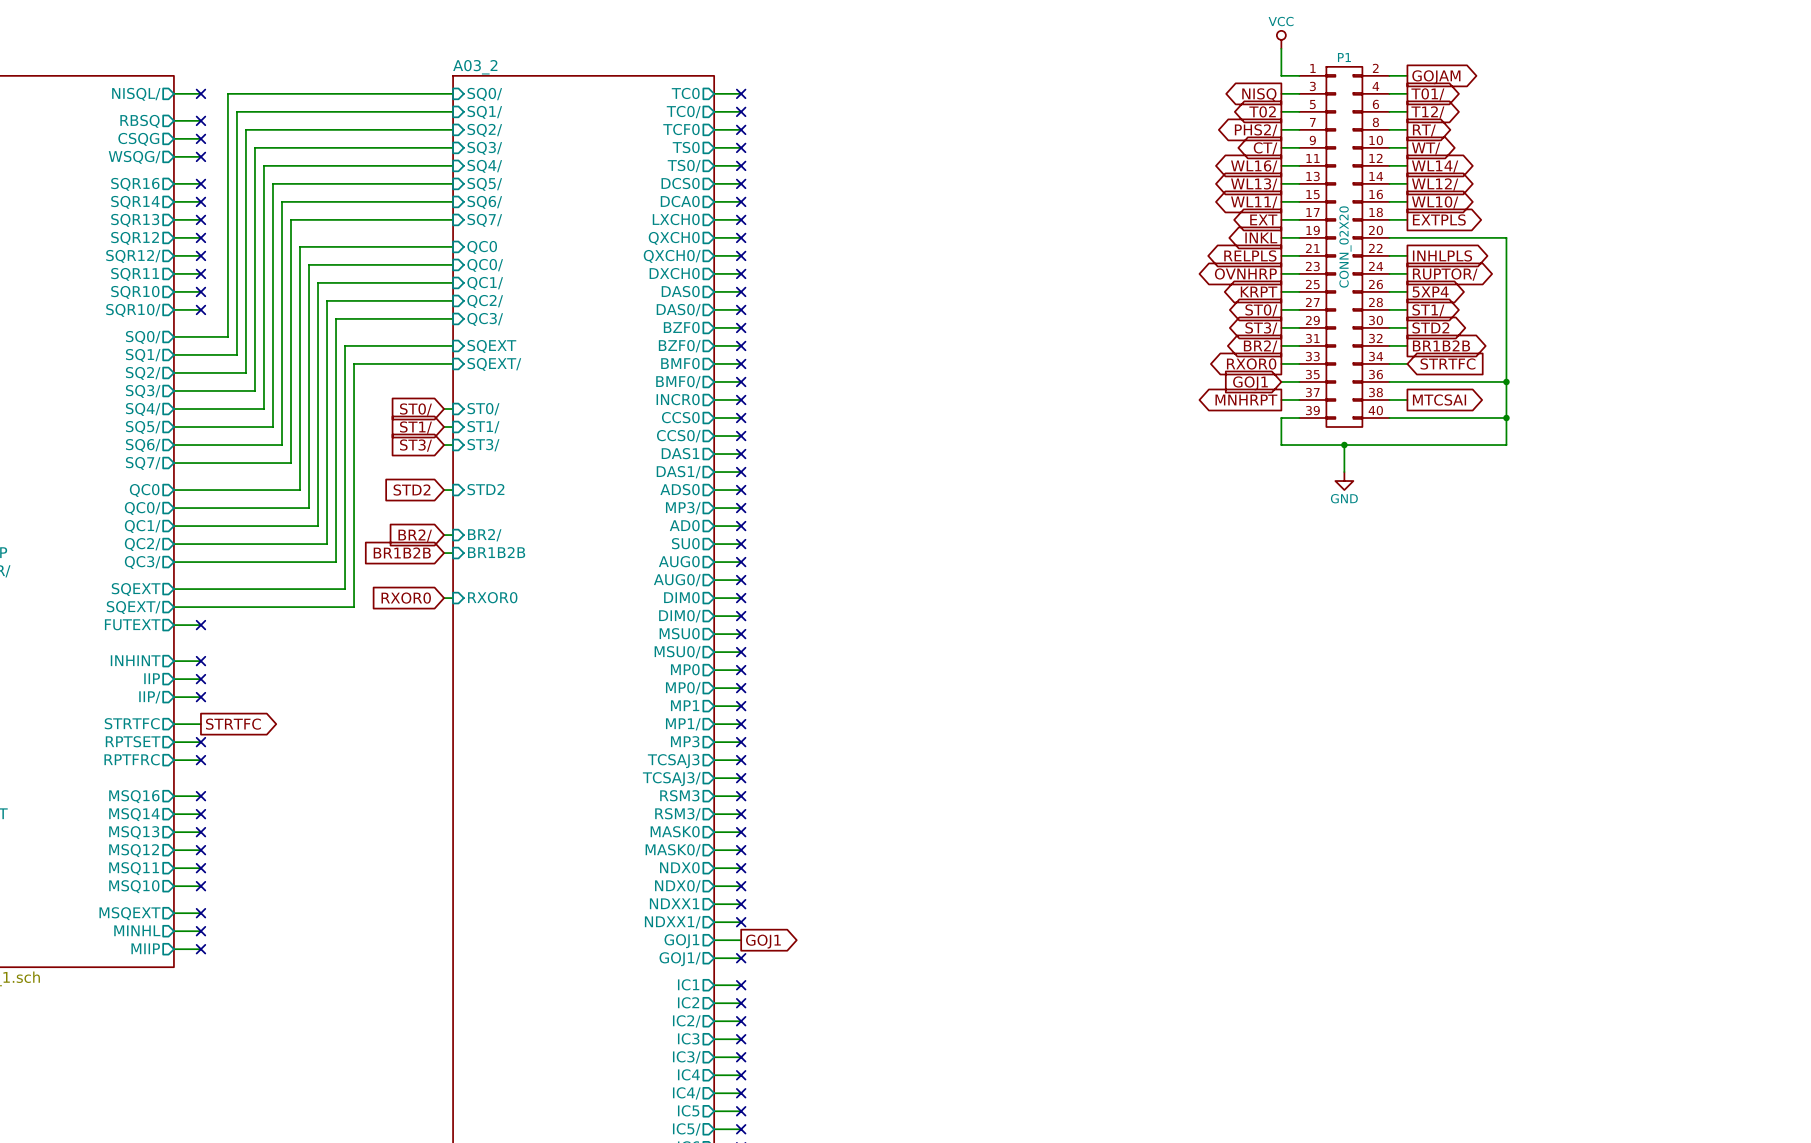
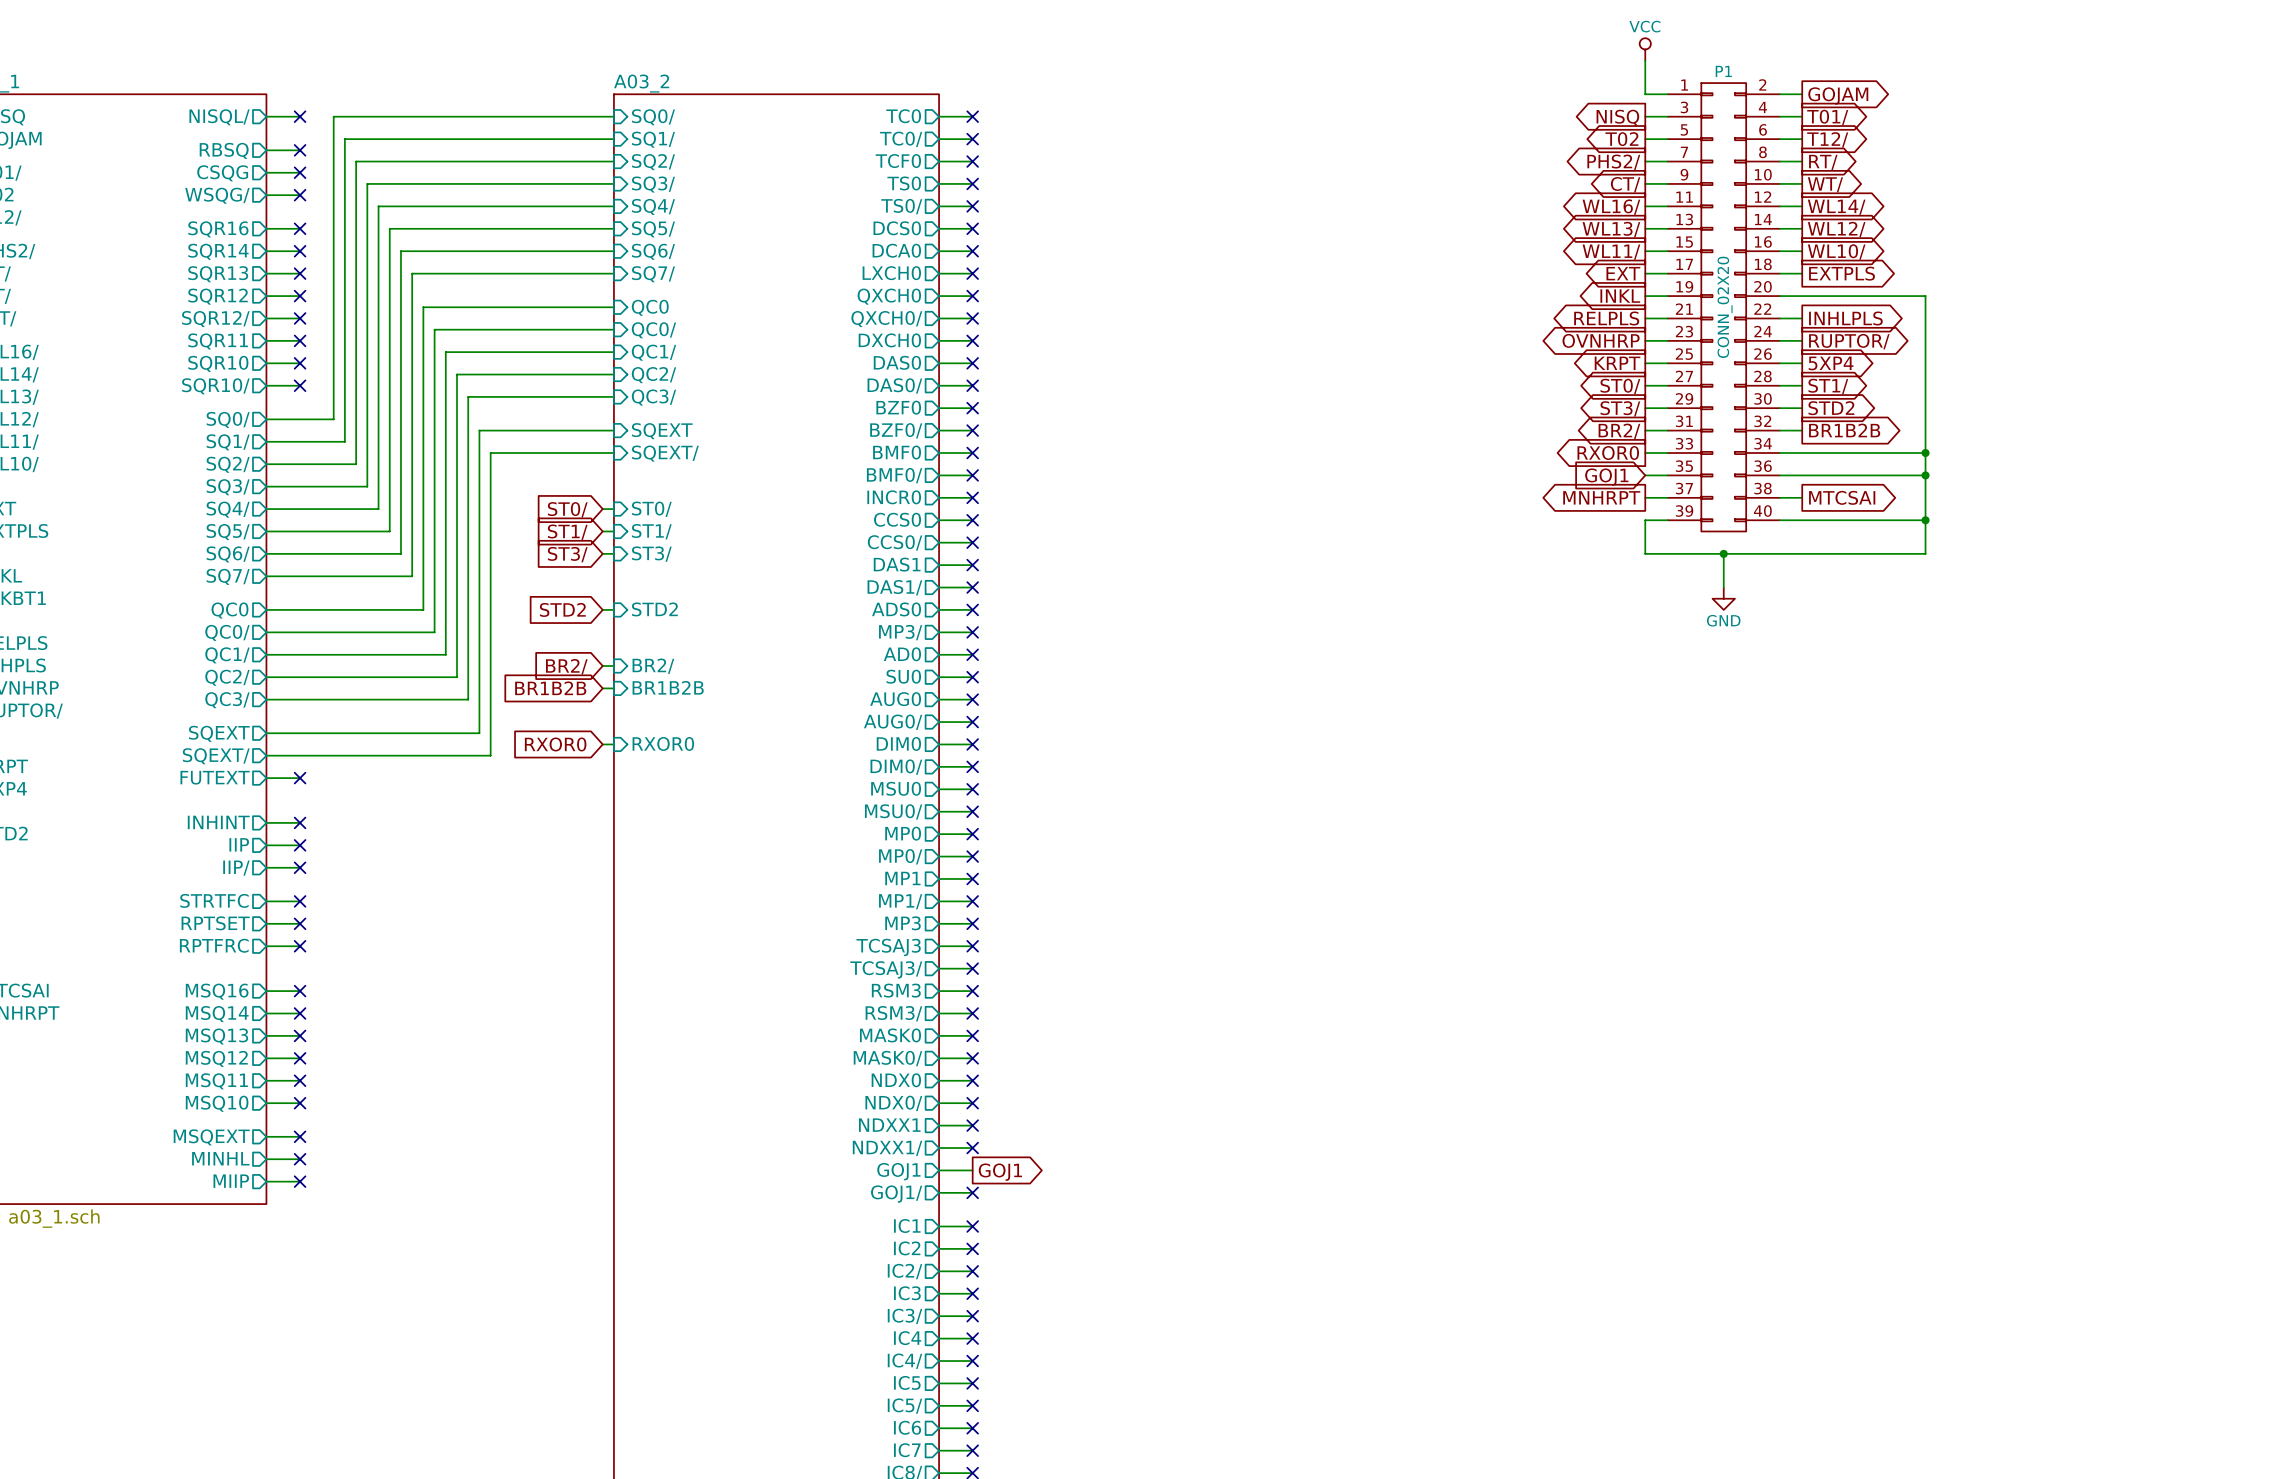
wire: none -> (1802, 453) (1925, 453)
global label: STRTFC (1448, 363) -> none
junction: none -> (1925, 453)
no-connect mark: none -> (300, 901)
global label: STRTFC (233, 724) -> none

